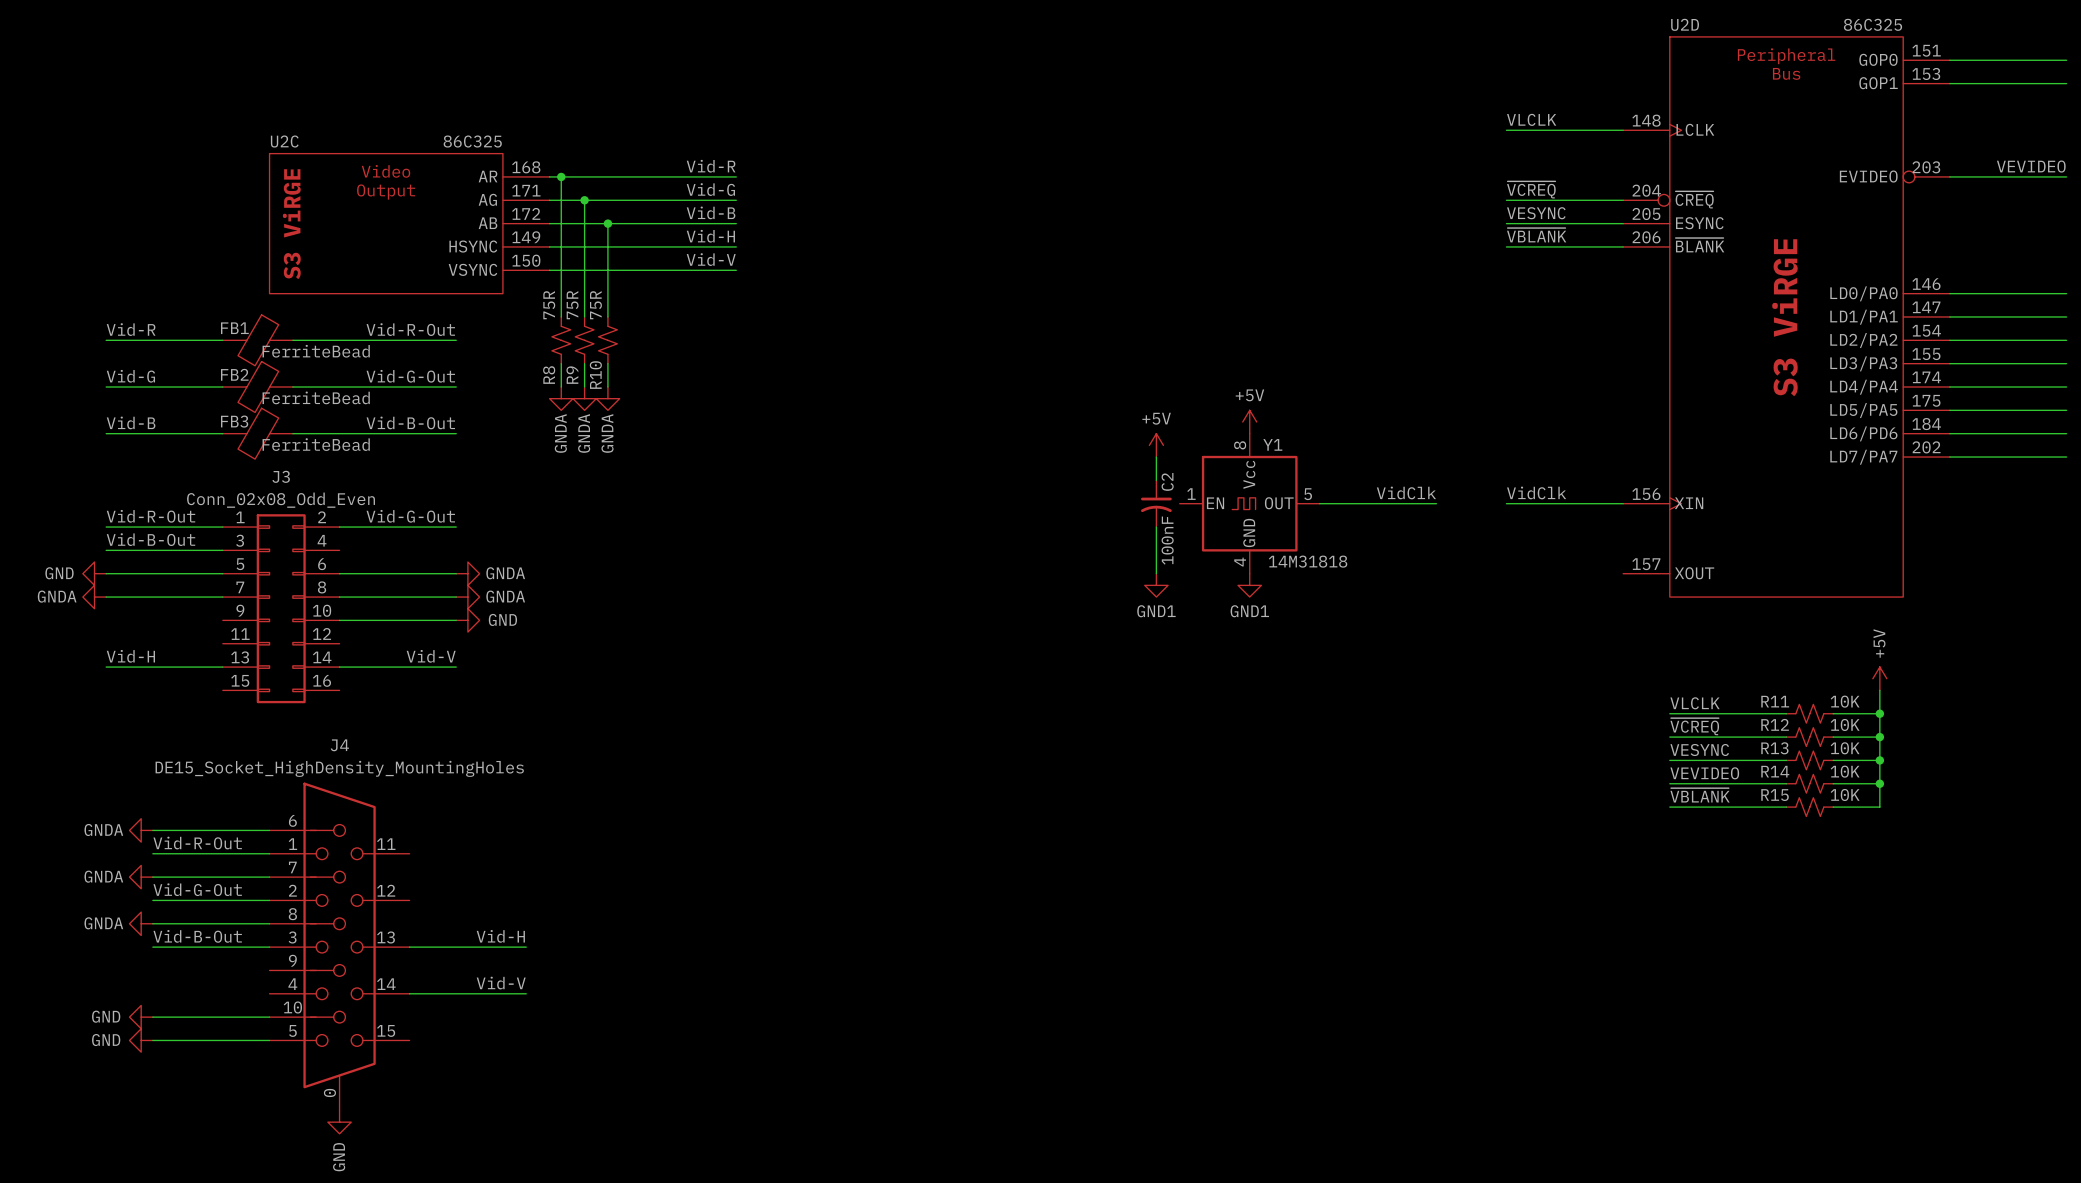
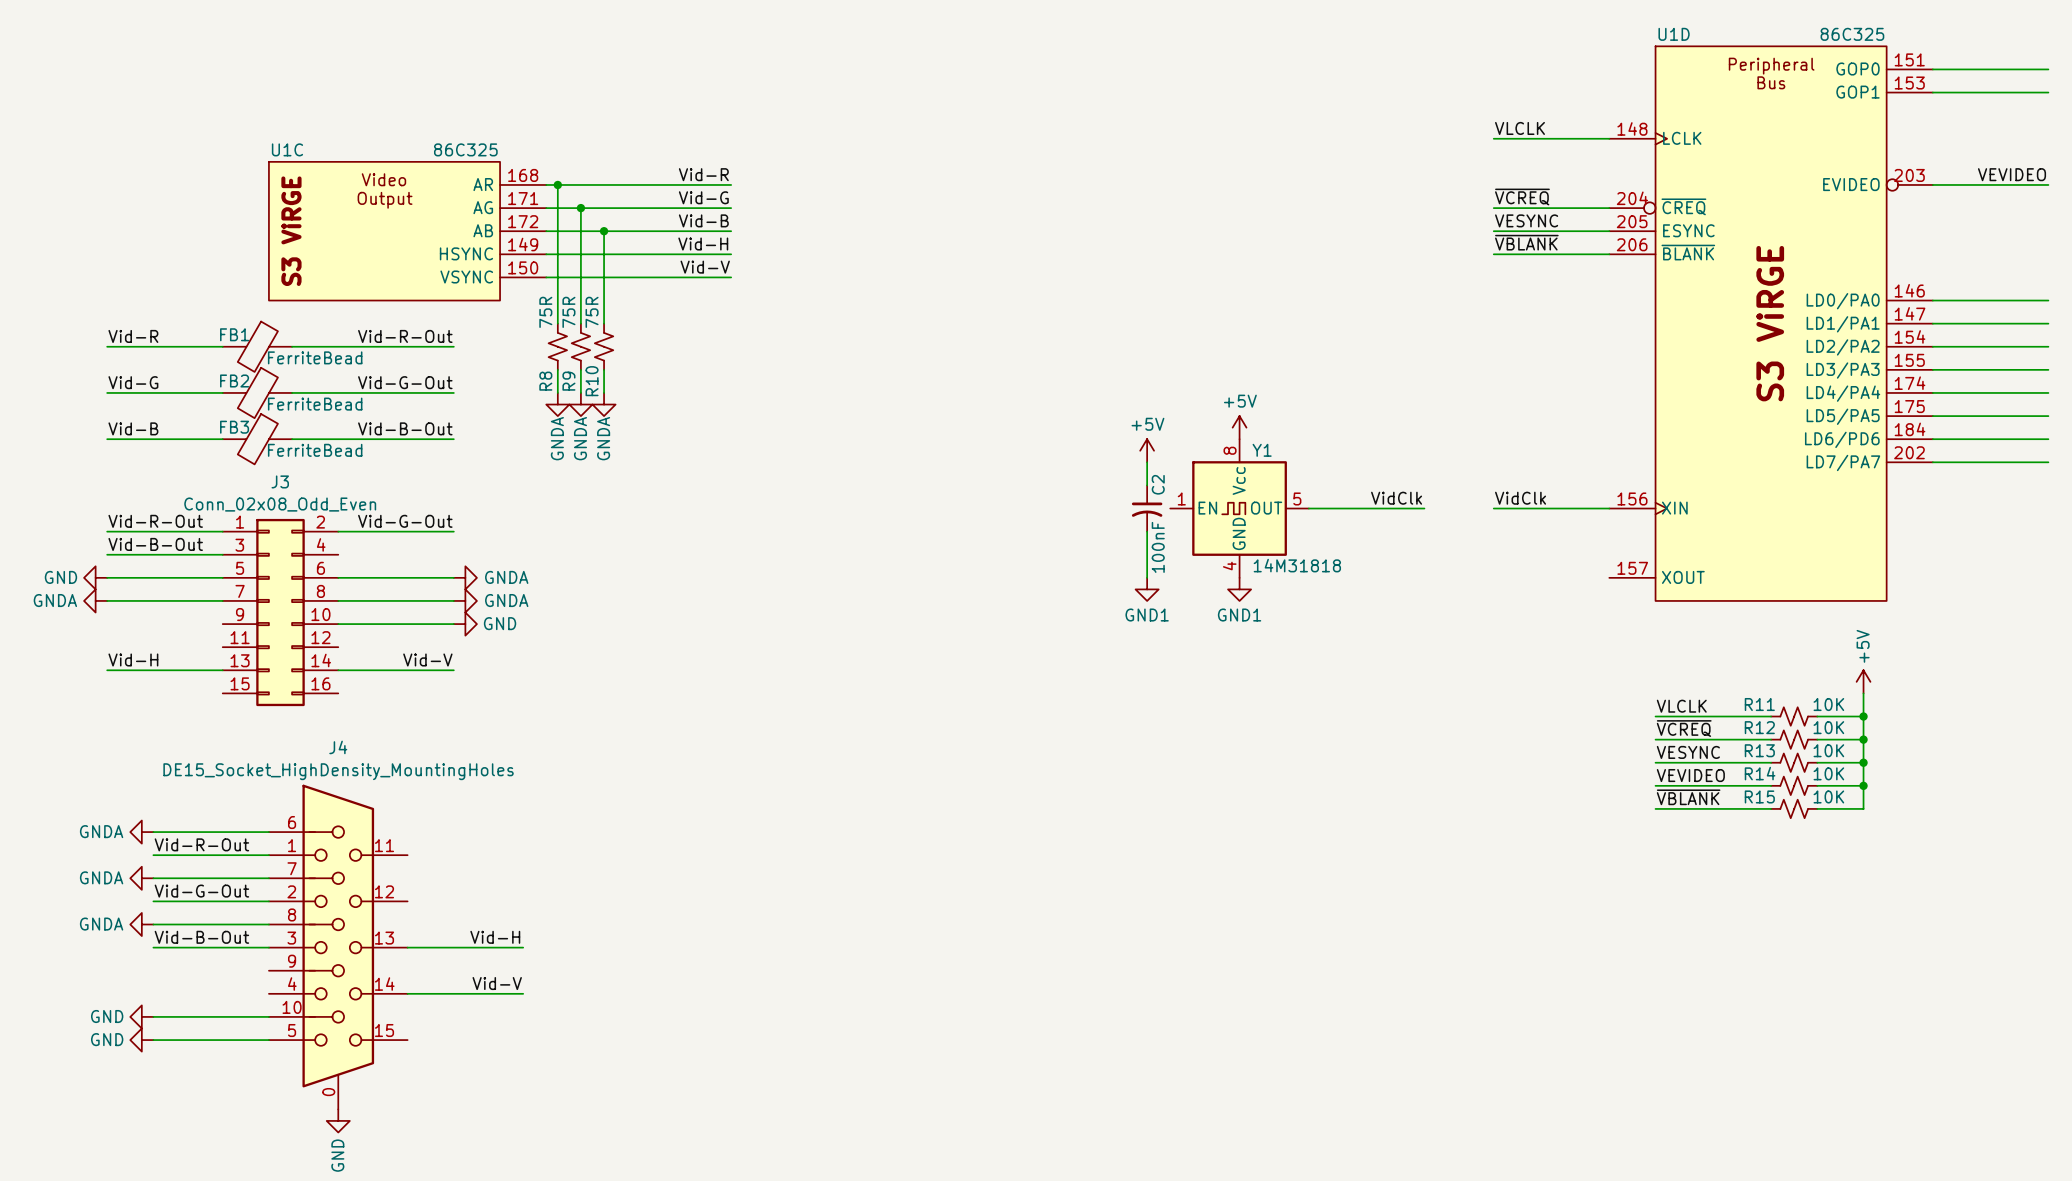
U2D name: U2D (1685, 24) -> U1D (1674, 34)
U2C name: U2C (284, 141) -> U1C (287, 149)

